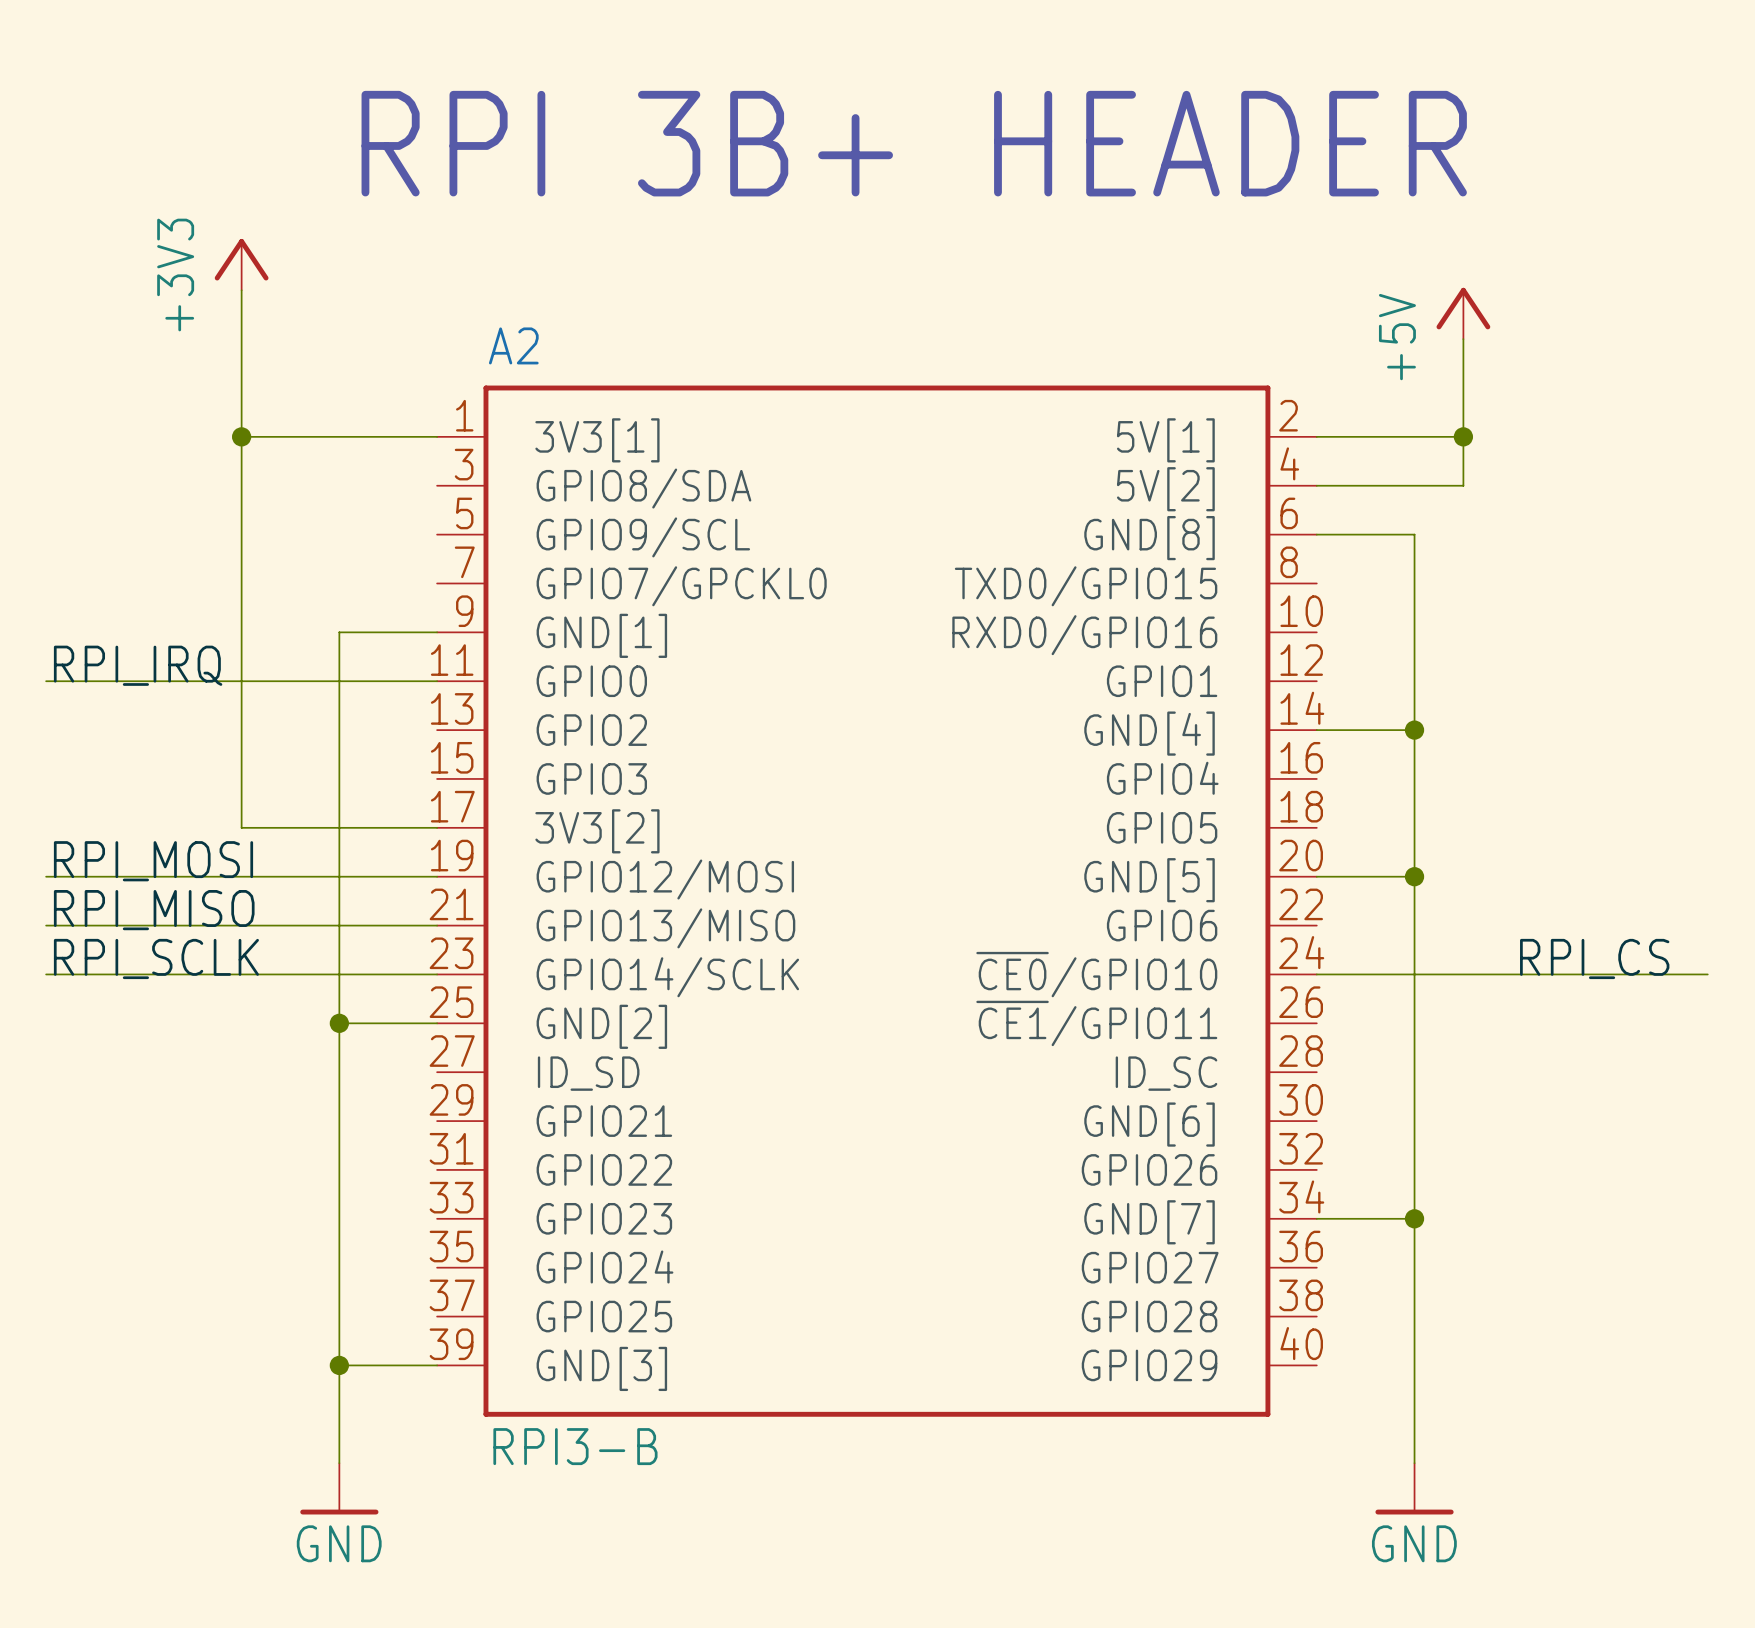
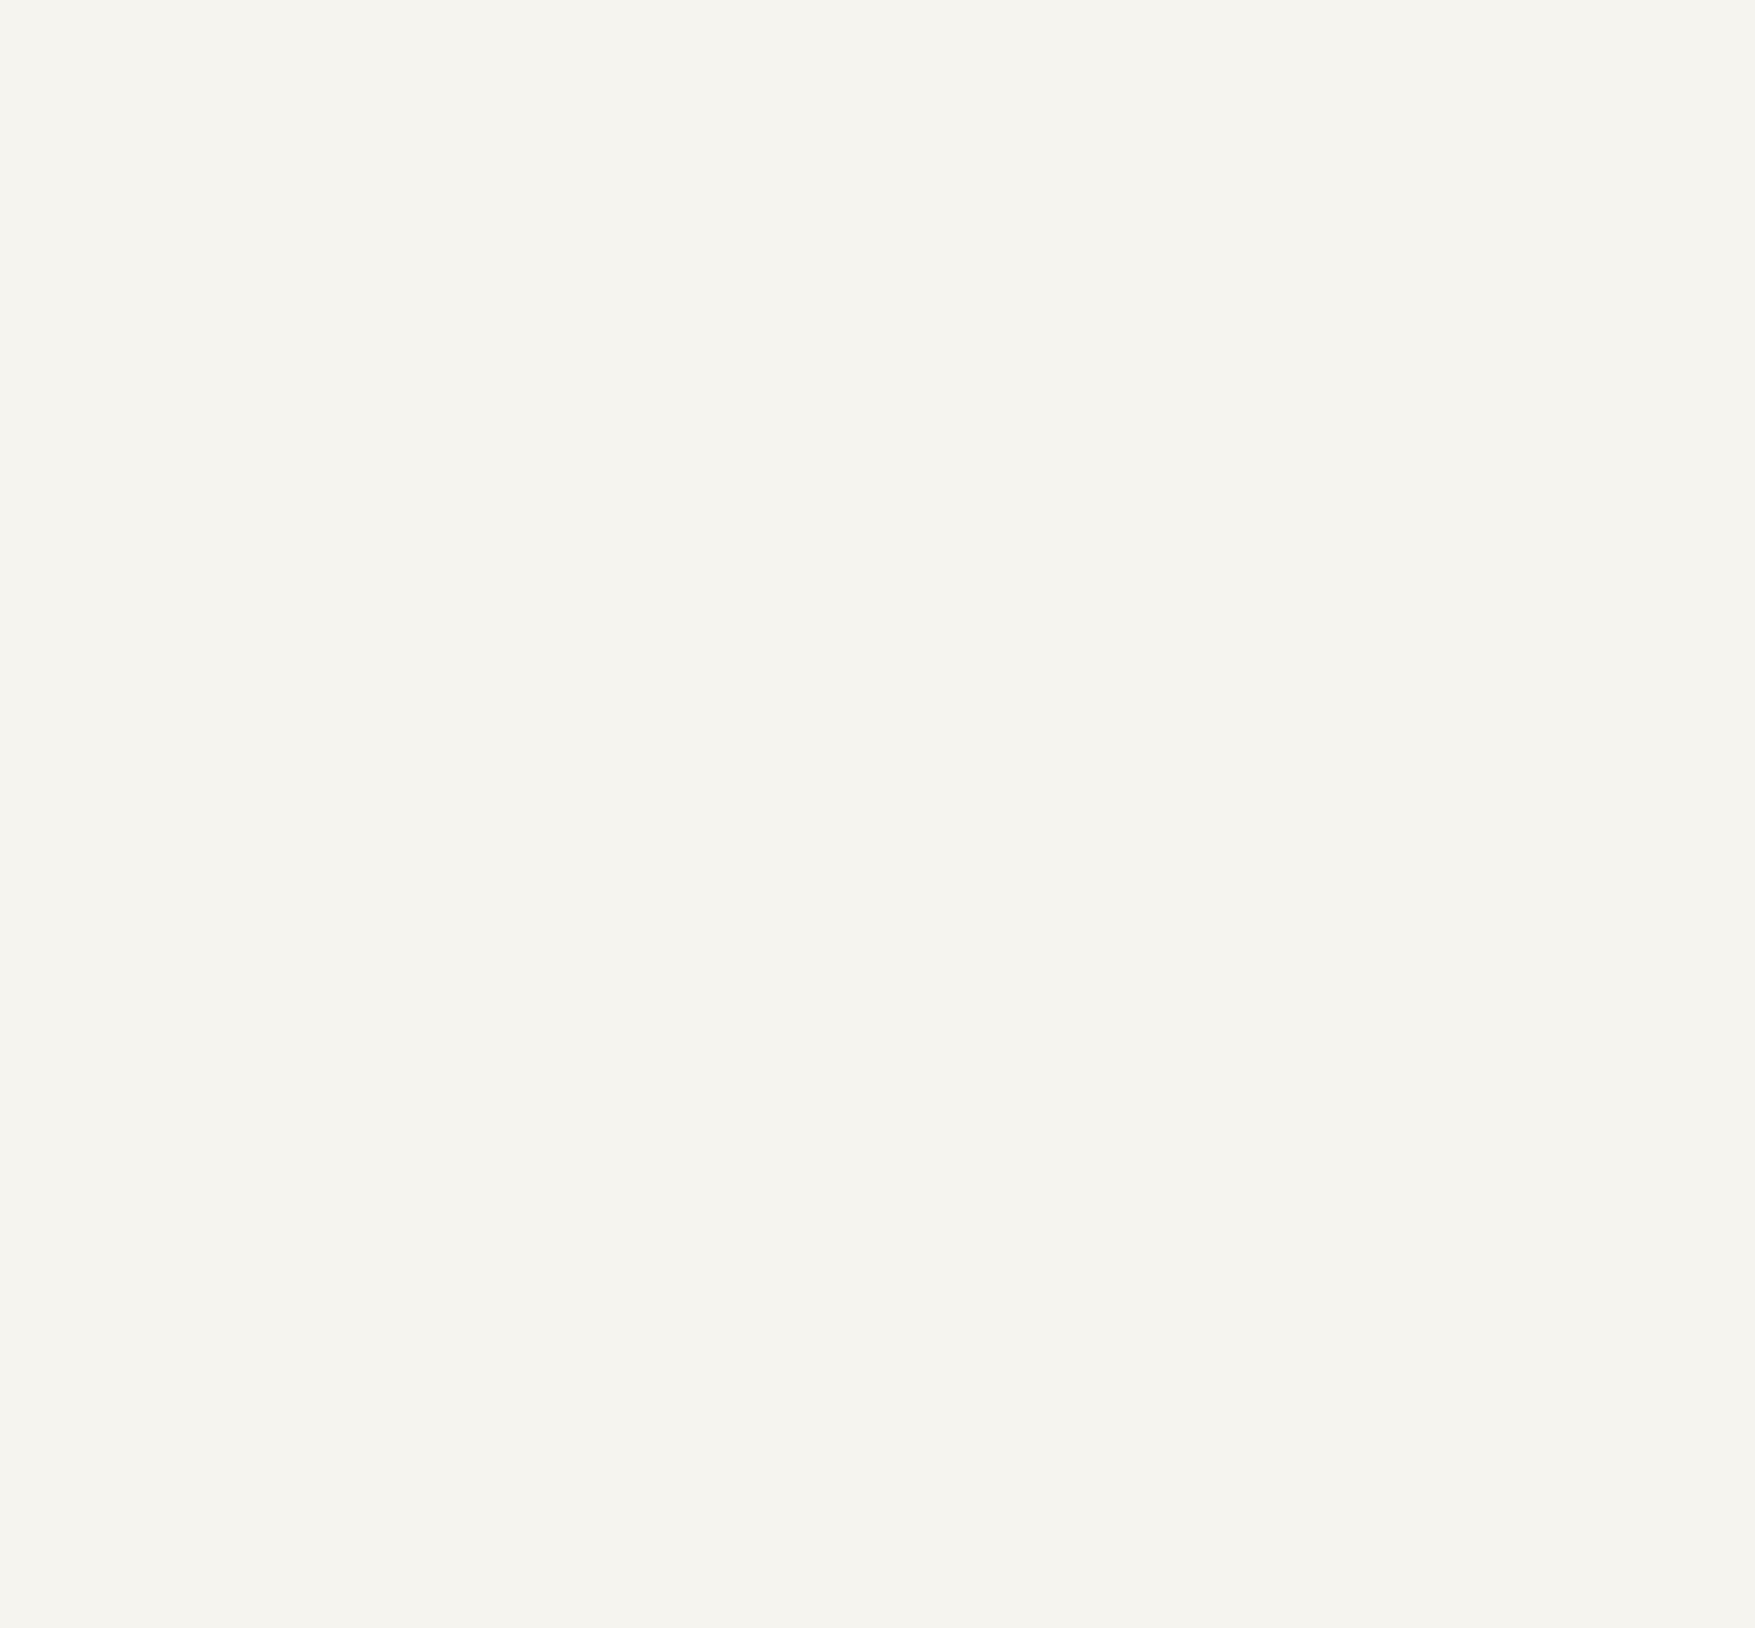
text: RPI 3B+ HEADER (914, 143) -> none
power symbol: +3V3 (241, 264) -> none
wire: (241, 290) (241, 827) (437, 827) -> none
power symbol: +5V (1463, 313) -> none
wire: (1463, 339) (1463, 485) (1316, 485) -> none
wire: (241, 436) (437, 436) -> none
junction: (241, 436) -> none
wire: (1316, 436) (1463, 436) -> none
junction: (1463, 436) -> none
wire: (1316, 534) (1414, 534) (1414, 1463) -> none
wire: (437, 632) (339, 632) (339, 1463) -> none
label: RPI_IRQ (138, 665) -> none
wire: (46, 681) (437, 681) -> none
wire: (1316, 730) (1414, 730) -> none
junction: (1414, 730) -> none
label: RPI_MOSI (153, 861) -> none
wire: (46, 876) (437, 876) -> none
wire: (1316, 876) (1414, 876) -> none
junction: (1414, 876) -> none
A2: RPI3-B (876, 901) -> none
label: RPI_MISO (154, 910) -> none
wire: (46, 925) (437, 925) -> none
label: RPI_SCLK (156, 958) -> none
label: RPI_CS (1594, 958) -> none
wire: (46, 974) (437, 974) -> none
wire: (1316, 974) (1707, 974) -> none
wire: (339, 1023) (437, 1023) -> none
junction: (339, 1023) -> none
wire: (1316, 1218) (1414, 1218) -> none
junction: (1414, 1218) -> none
wire: (339, 1365) (437, 1365) -> none
junction: (339, 1365) -> none
power symbol: GND (339, 1488) -> none
power symbol: GND (1414, 1488) -> none

